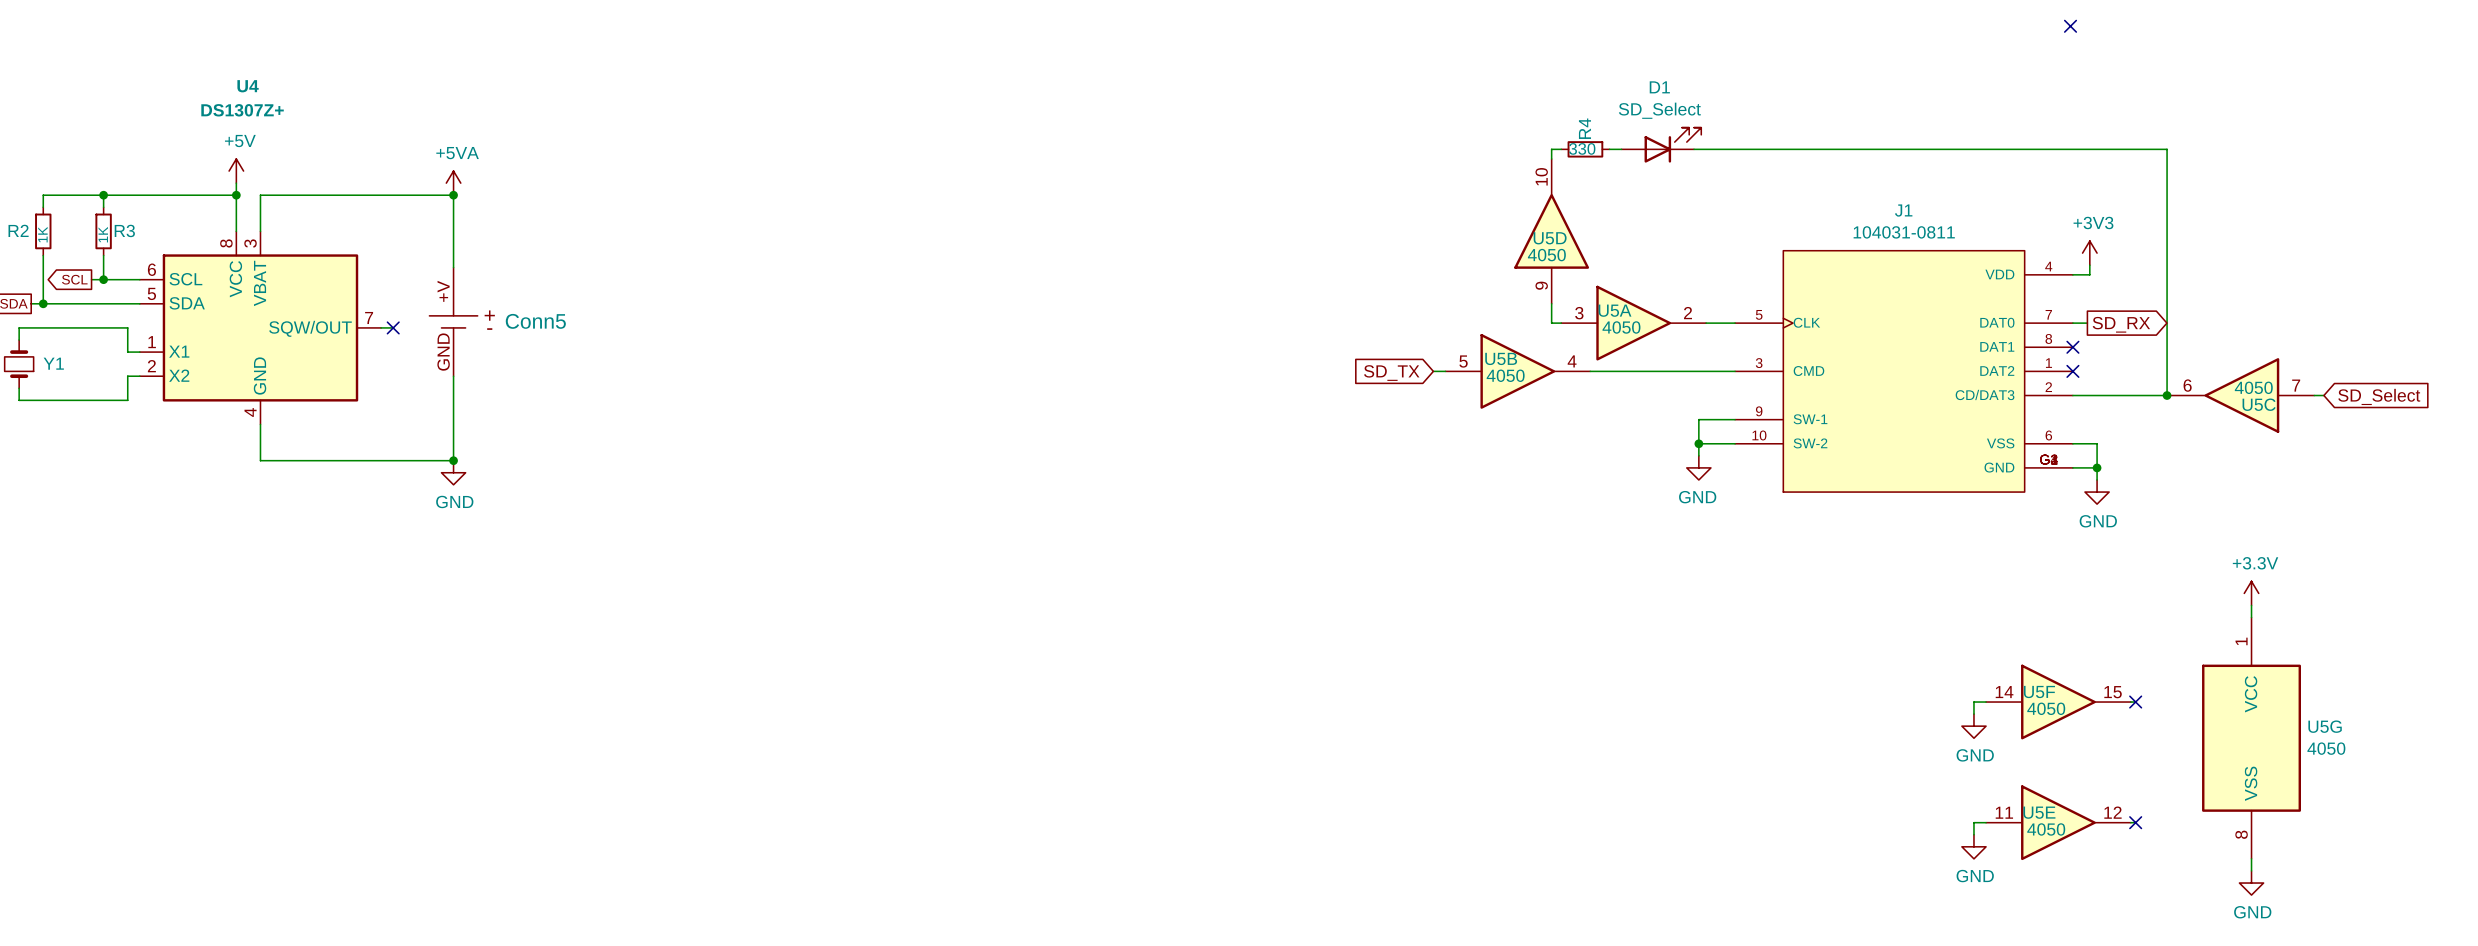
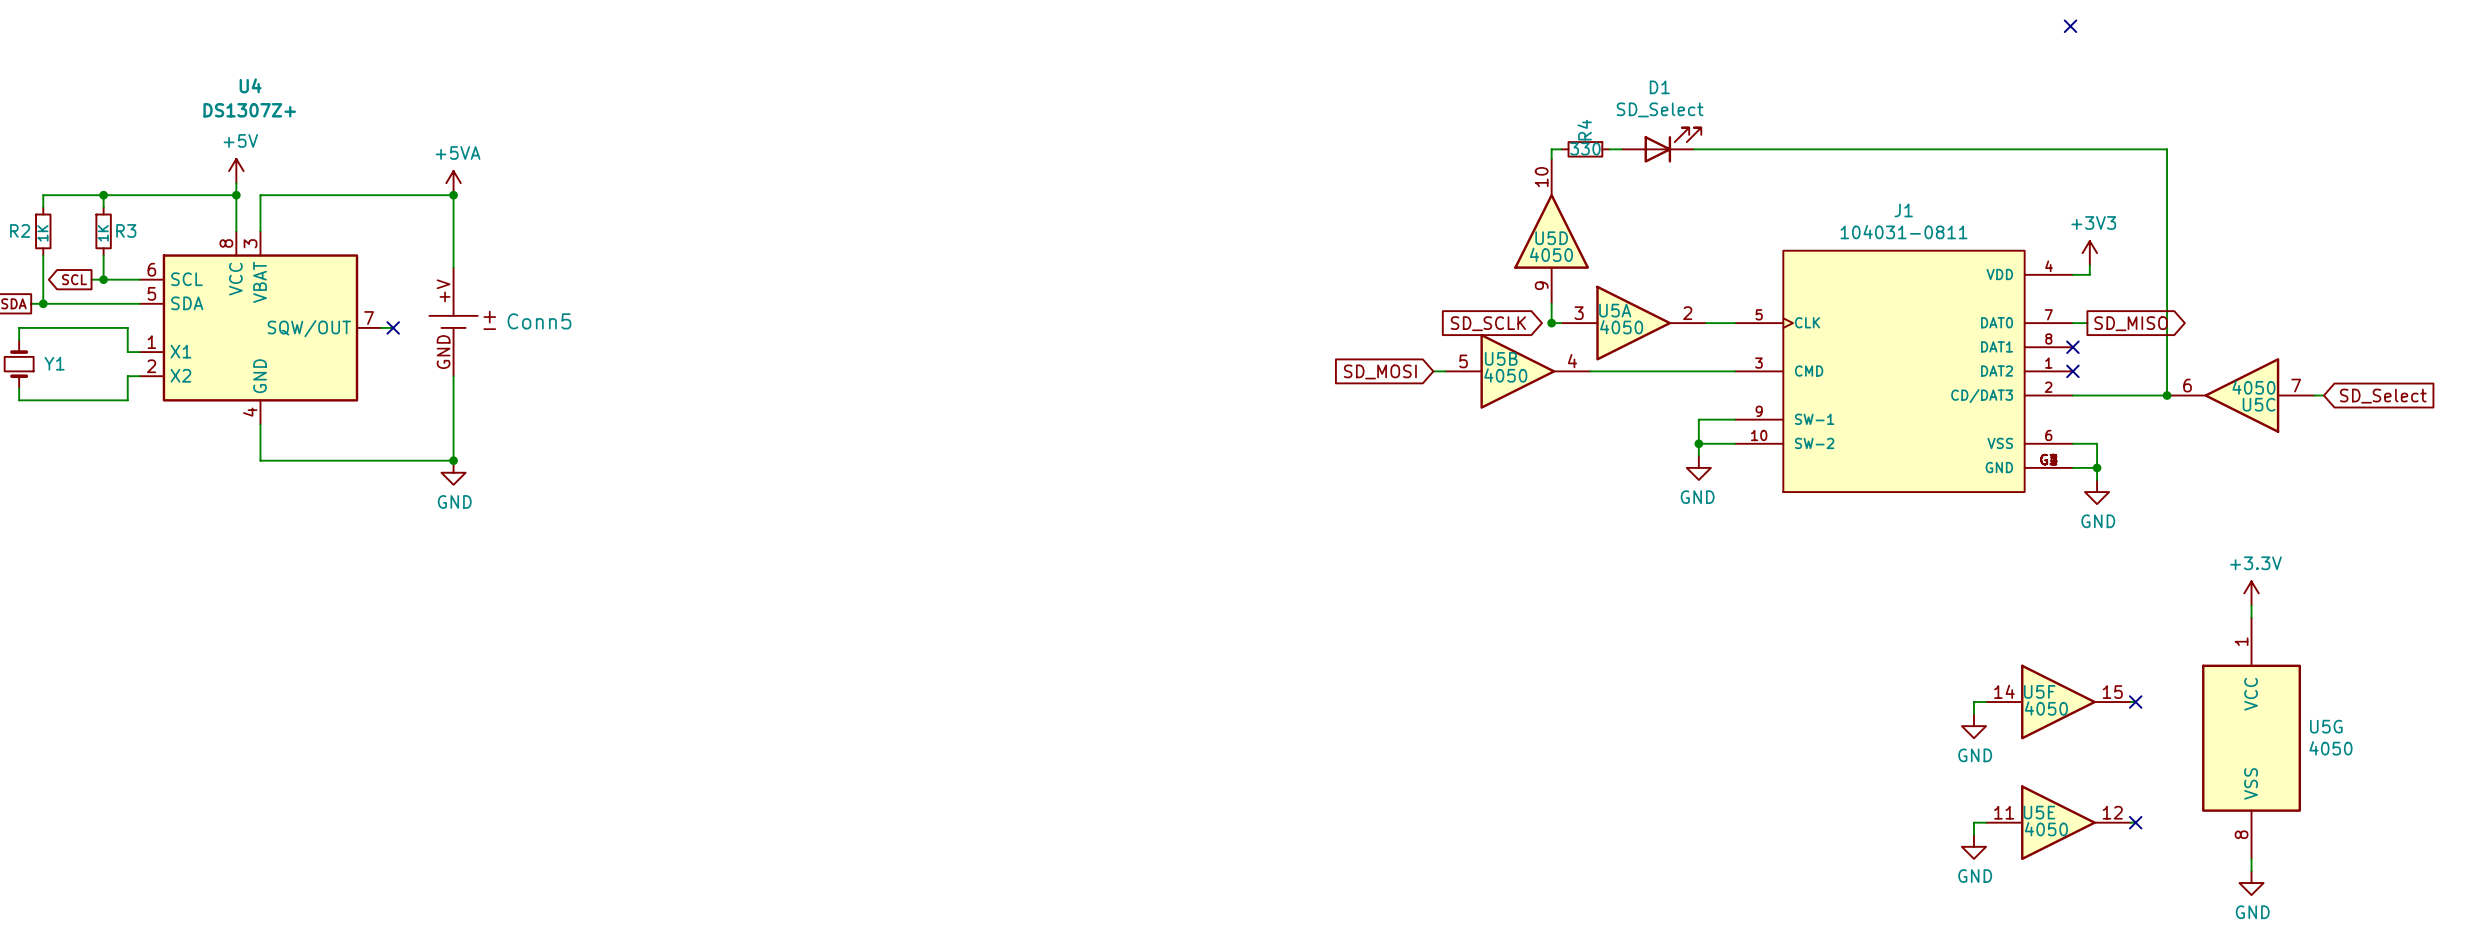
junction: none -> (1551, 323)
global label: none -> SD_SCLK (1488, 323)
global label: SD_RX (2121, 324) -> SD_MISO (2131, 323)
global label: SD_TX (1391, 373) -> SD_MOSI (1380, 371)

